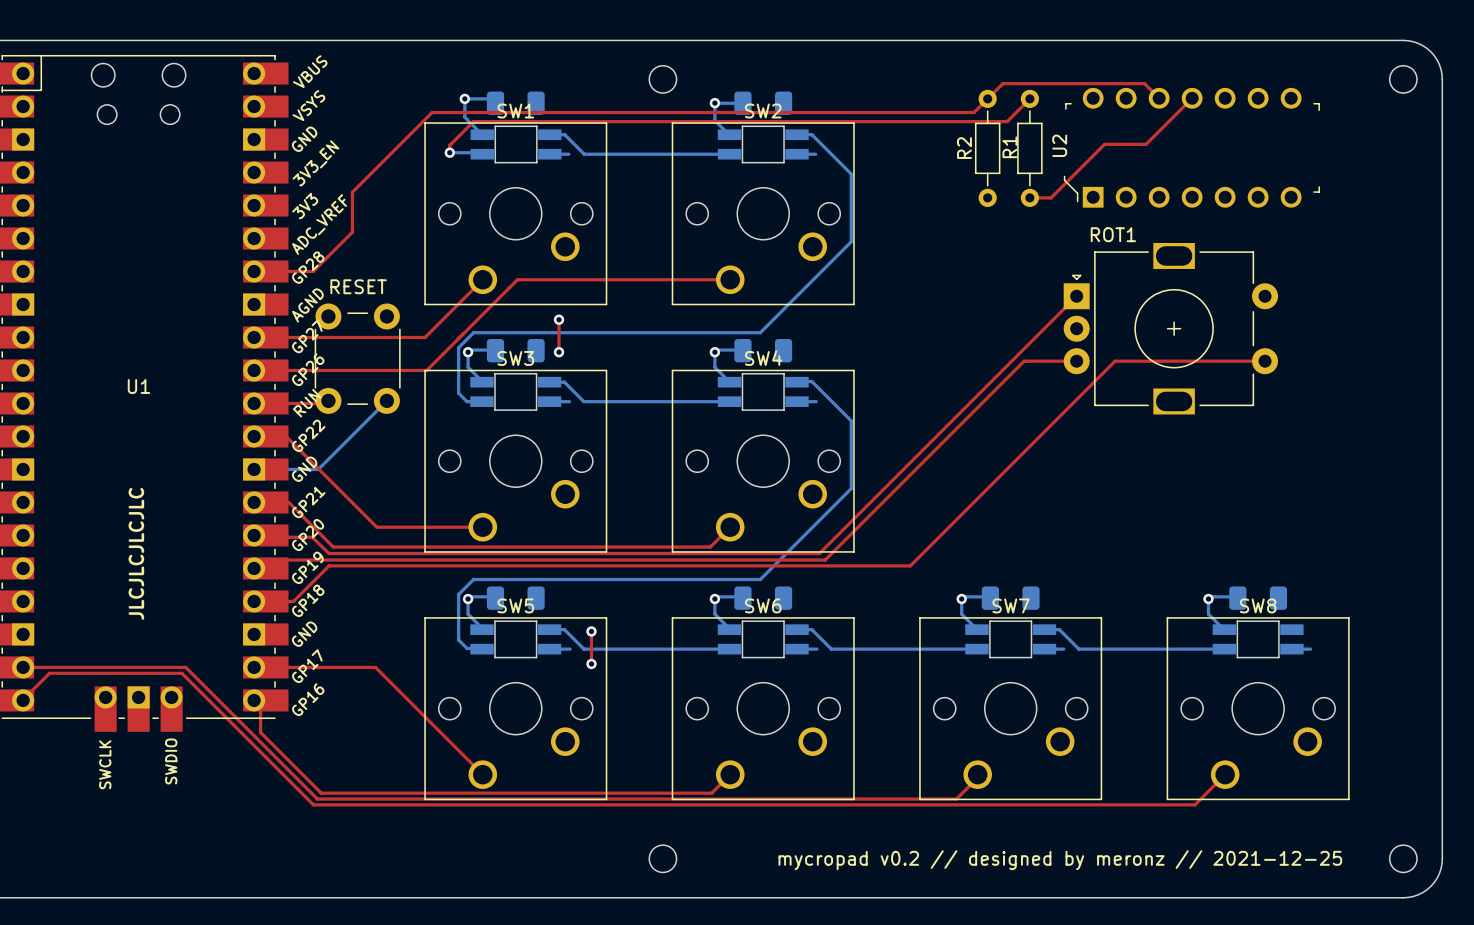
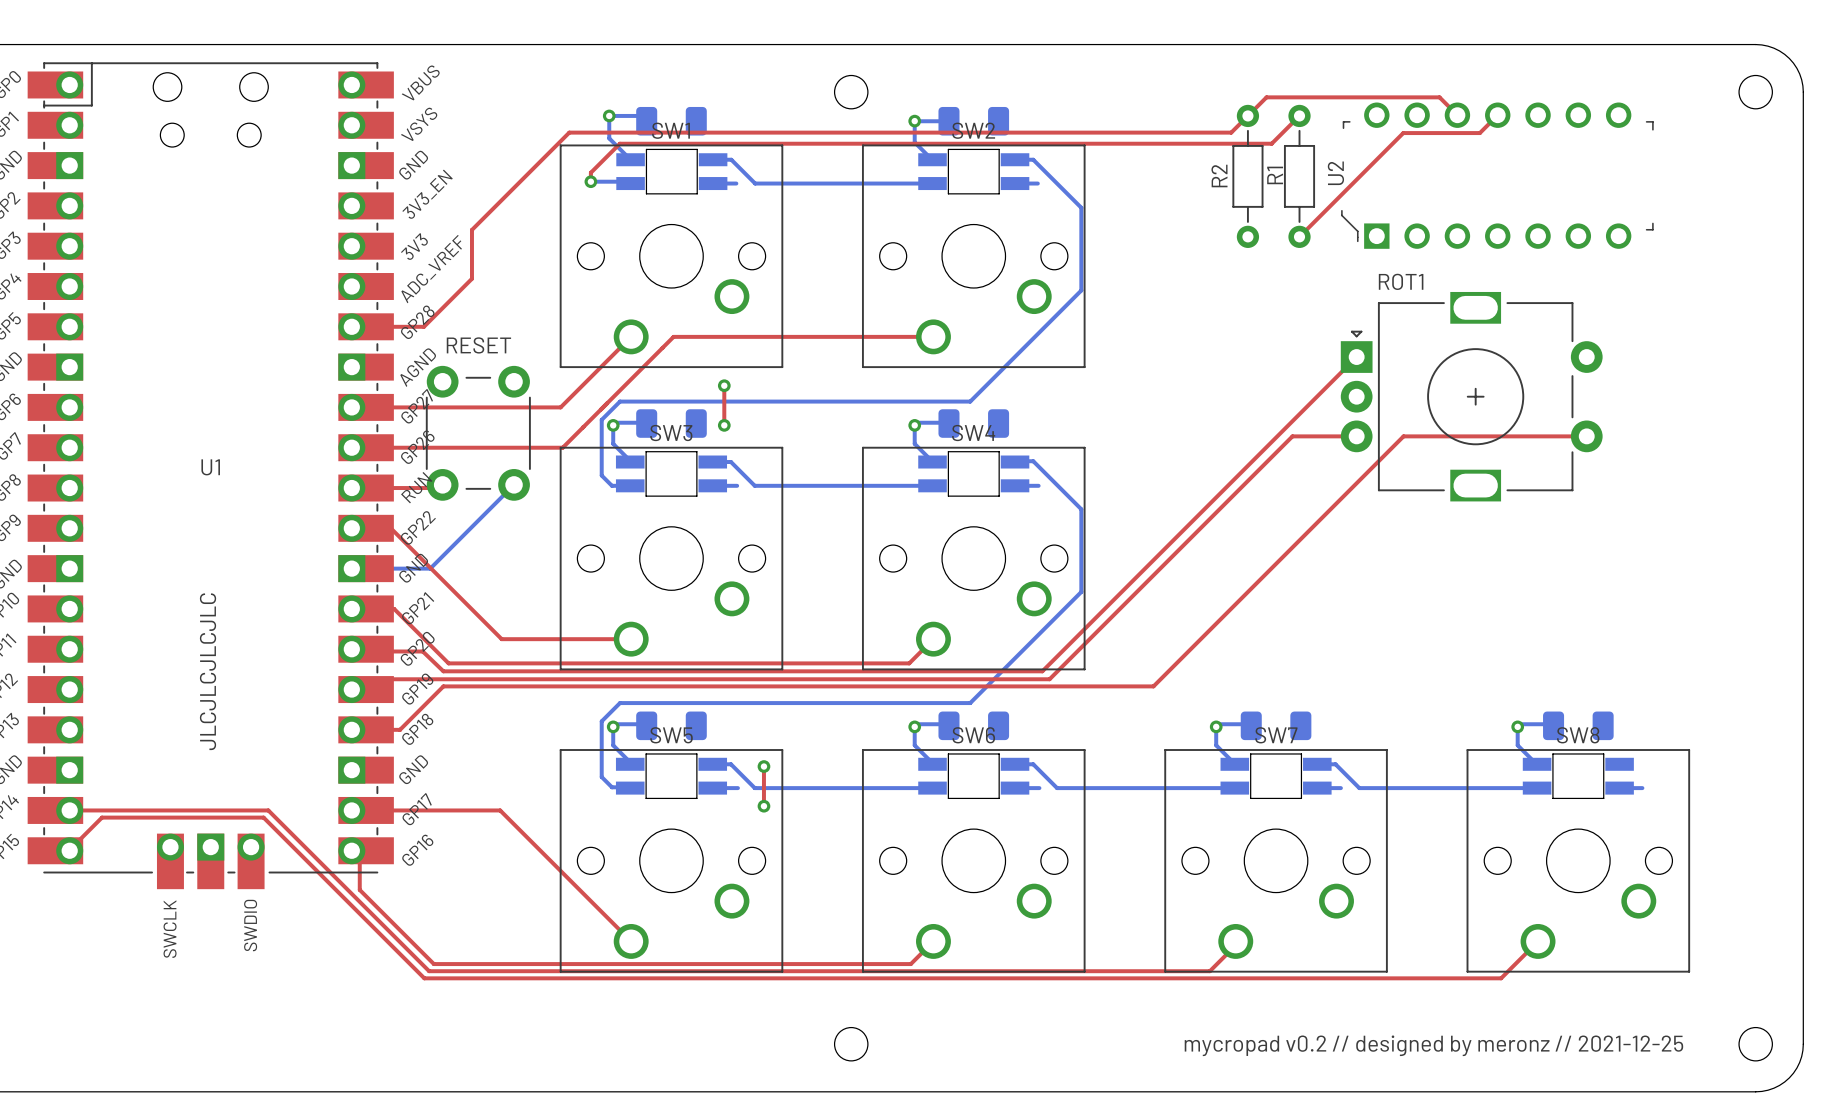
top track: (1177, 112) (1146, 144) (1104, 144) (1051, 197) (1029, 197) -> (1479, 133) (1403, 133) (1299, 236)

